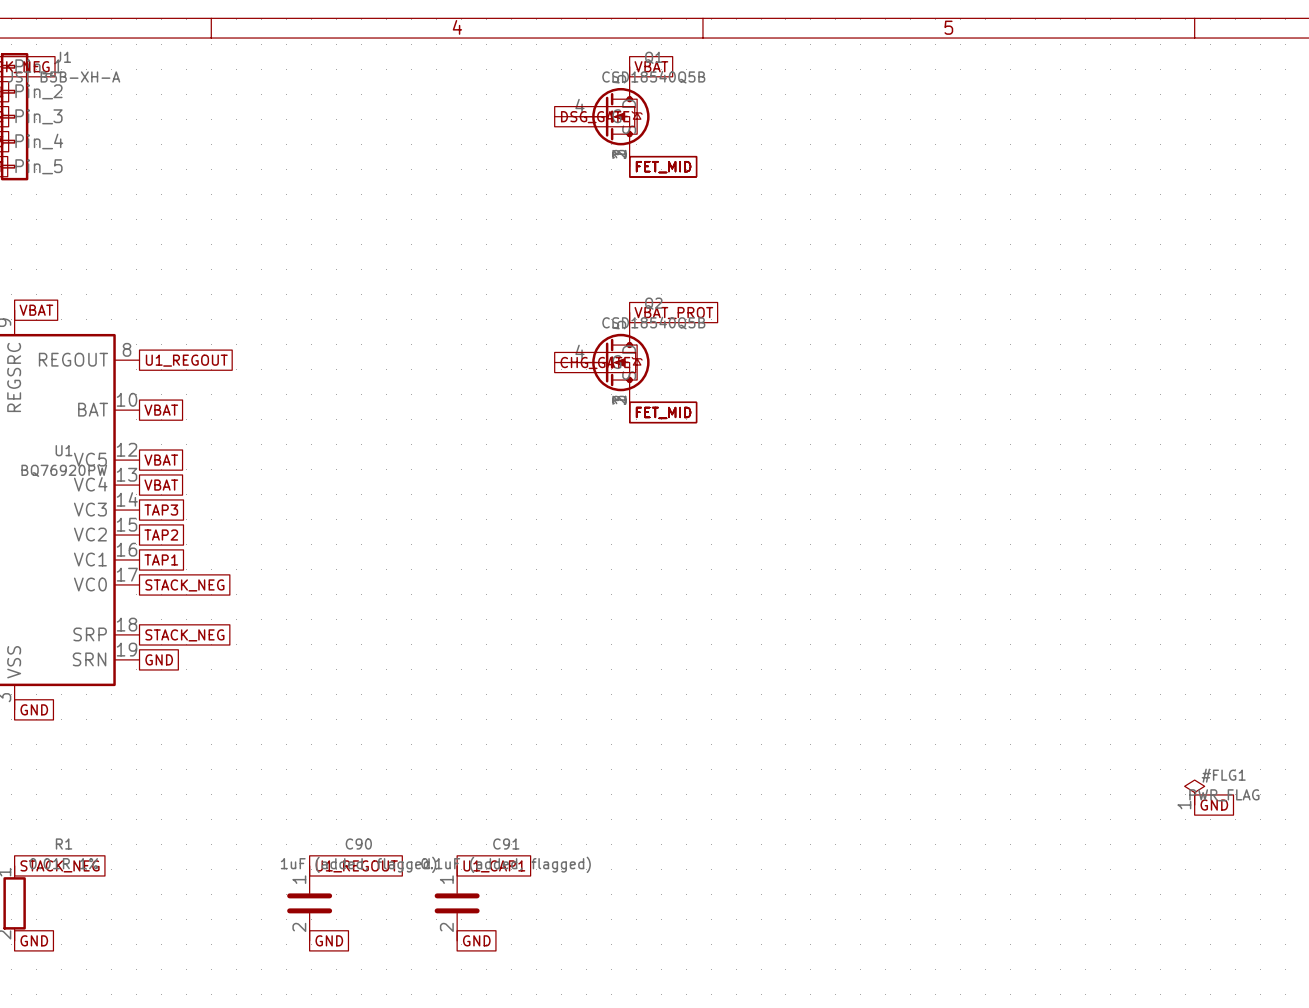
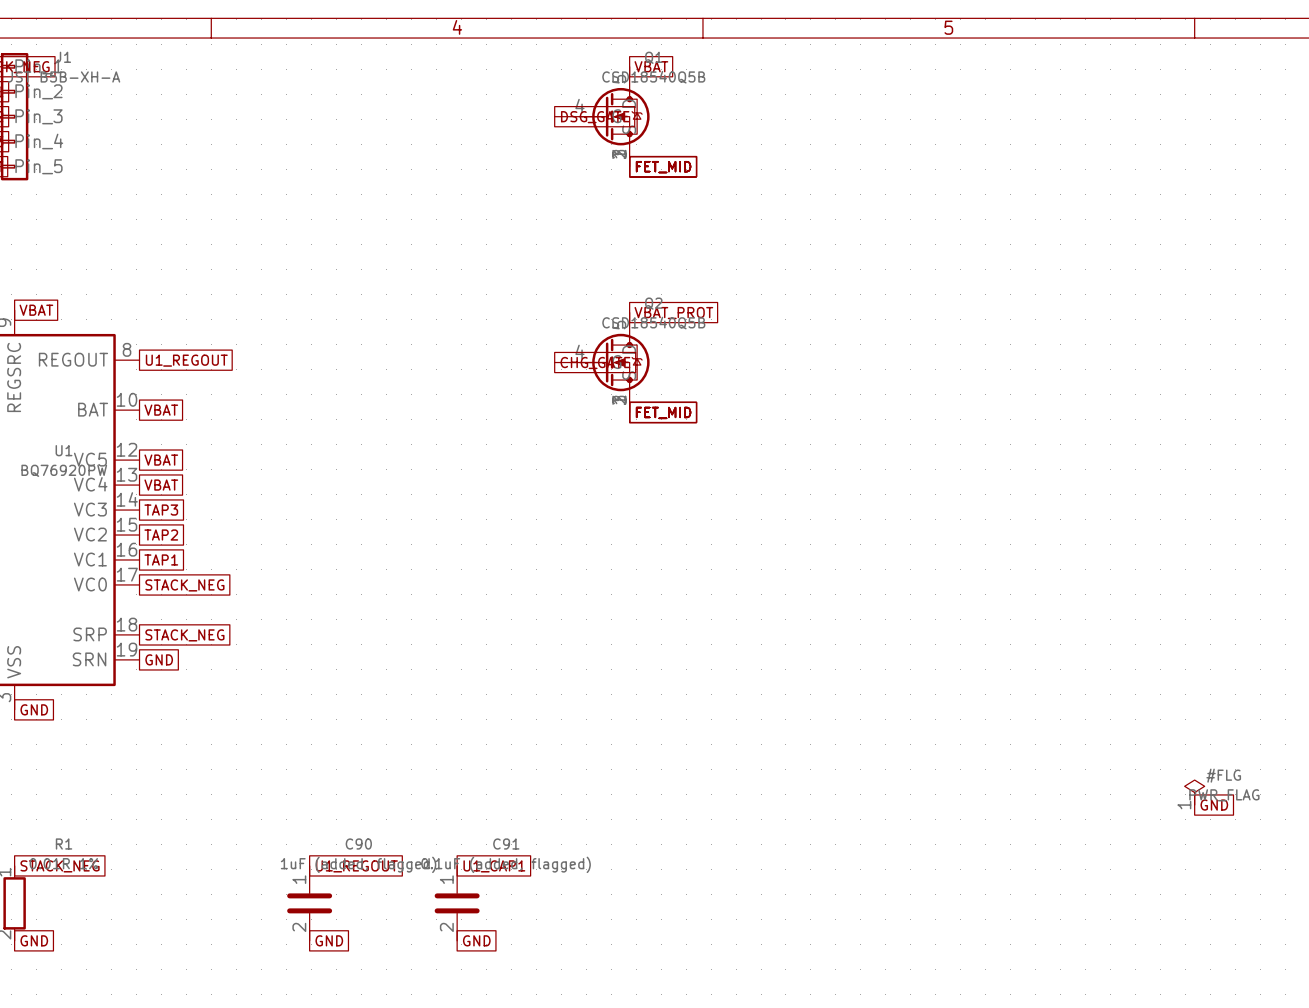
#FLG1 name: #FLG1 (1223, 775) -> #FLG (1223, 775)

